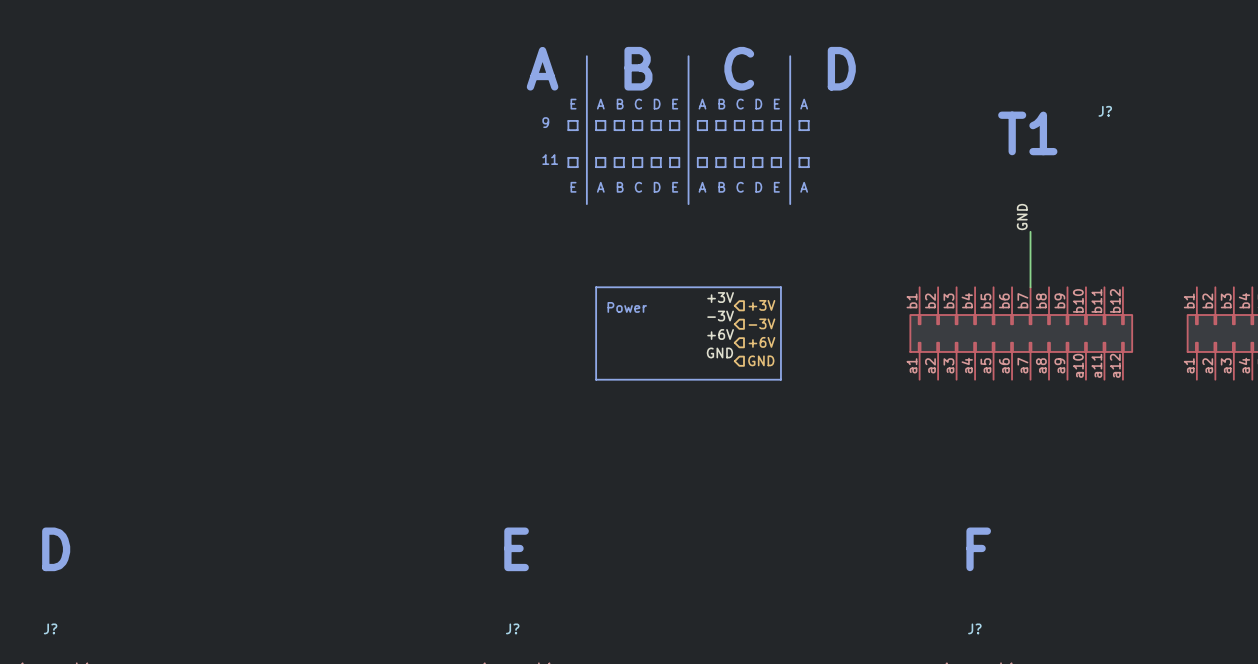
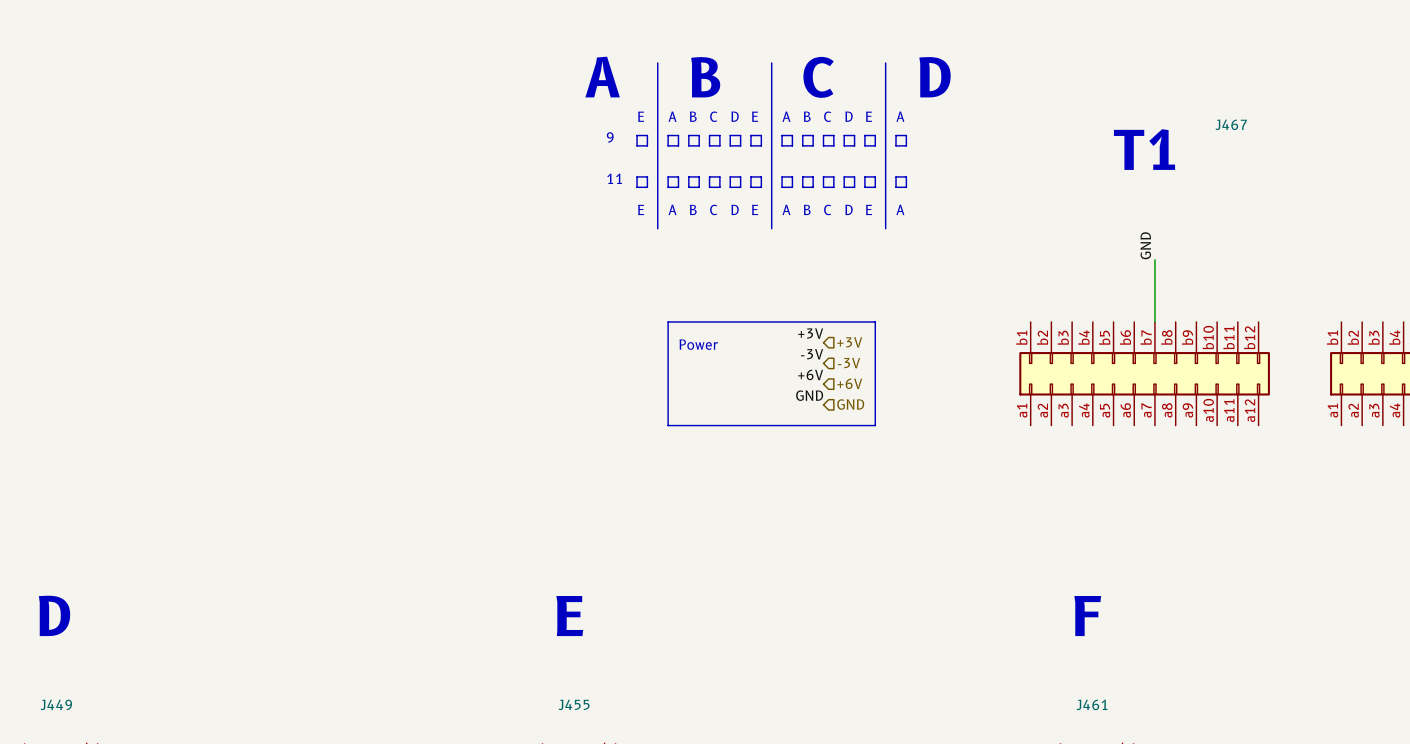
J? name: J? (1105, 111) -> J467 (1231, 124)
J? name: J? (50, 628) -> J449 (56, 704)
J? name: J? (512, 628) -> J455 (574, 704)
J? name: J? (974, 628) -> J461 (1091, 704)

